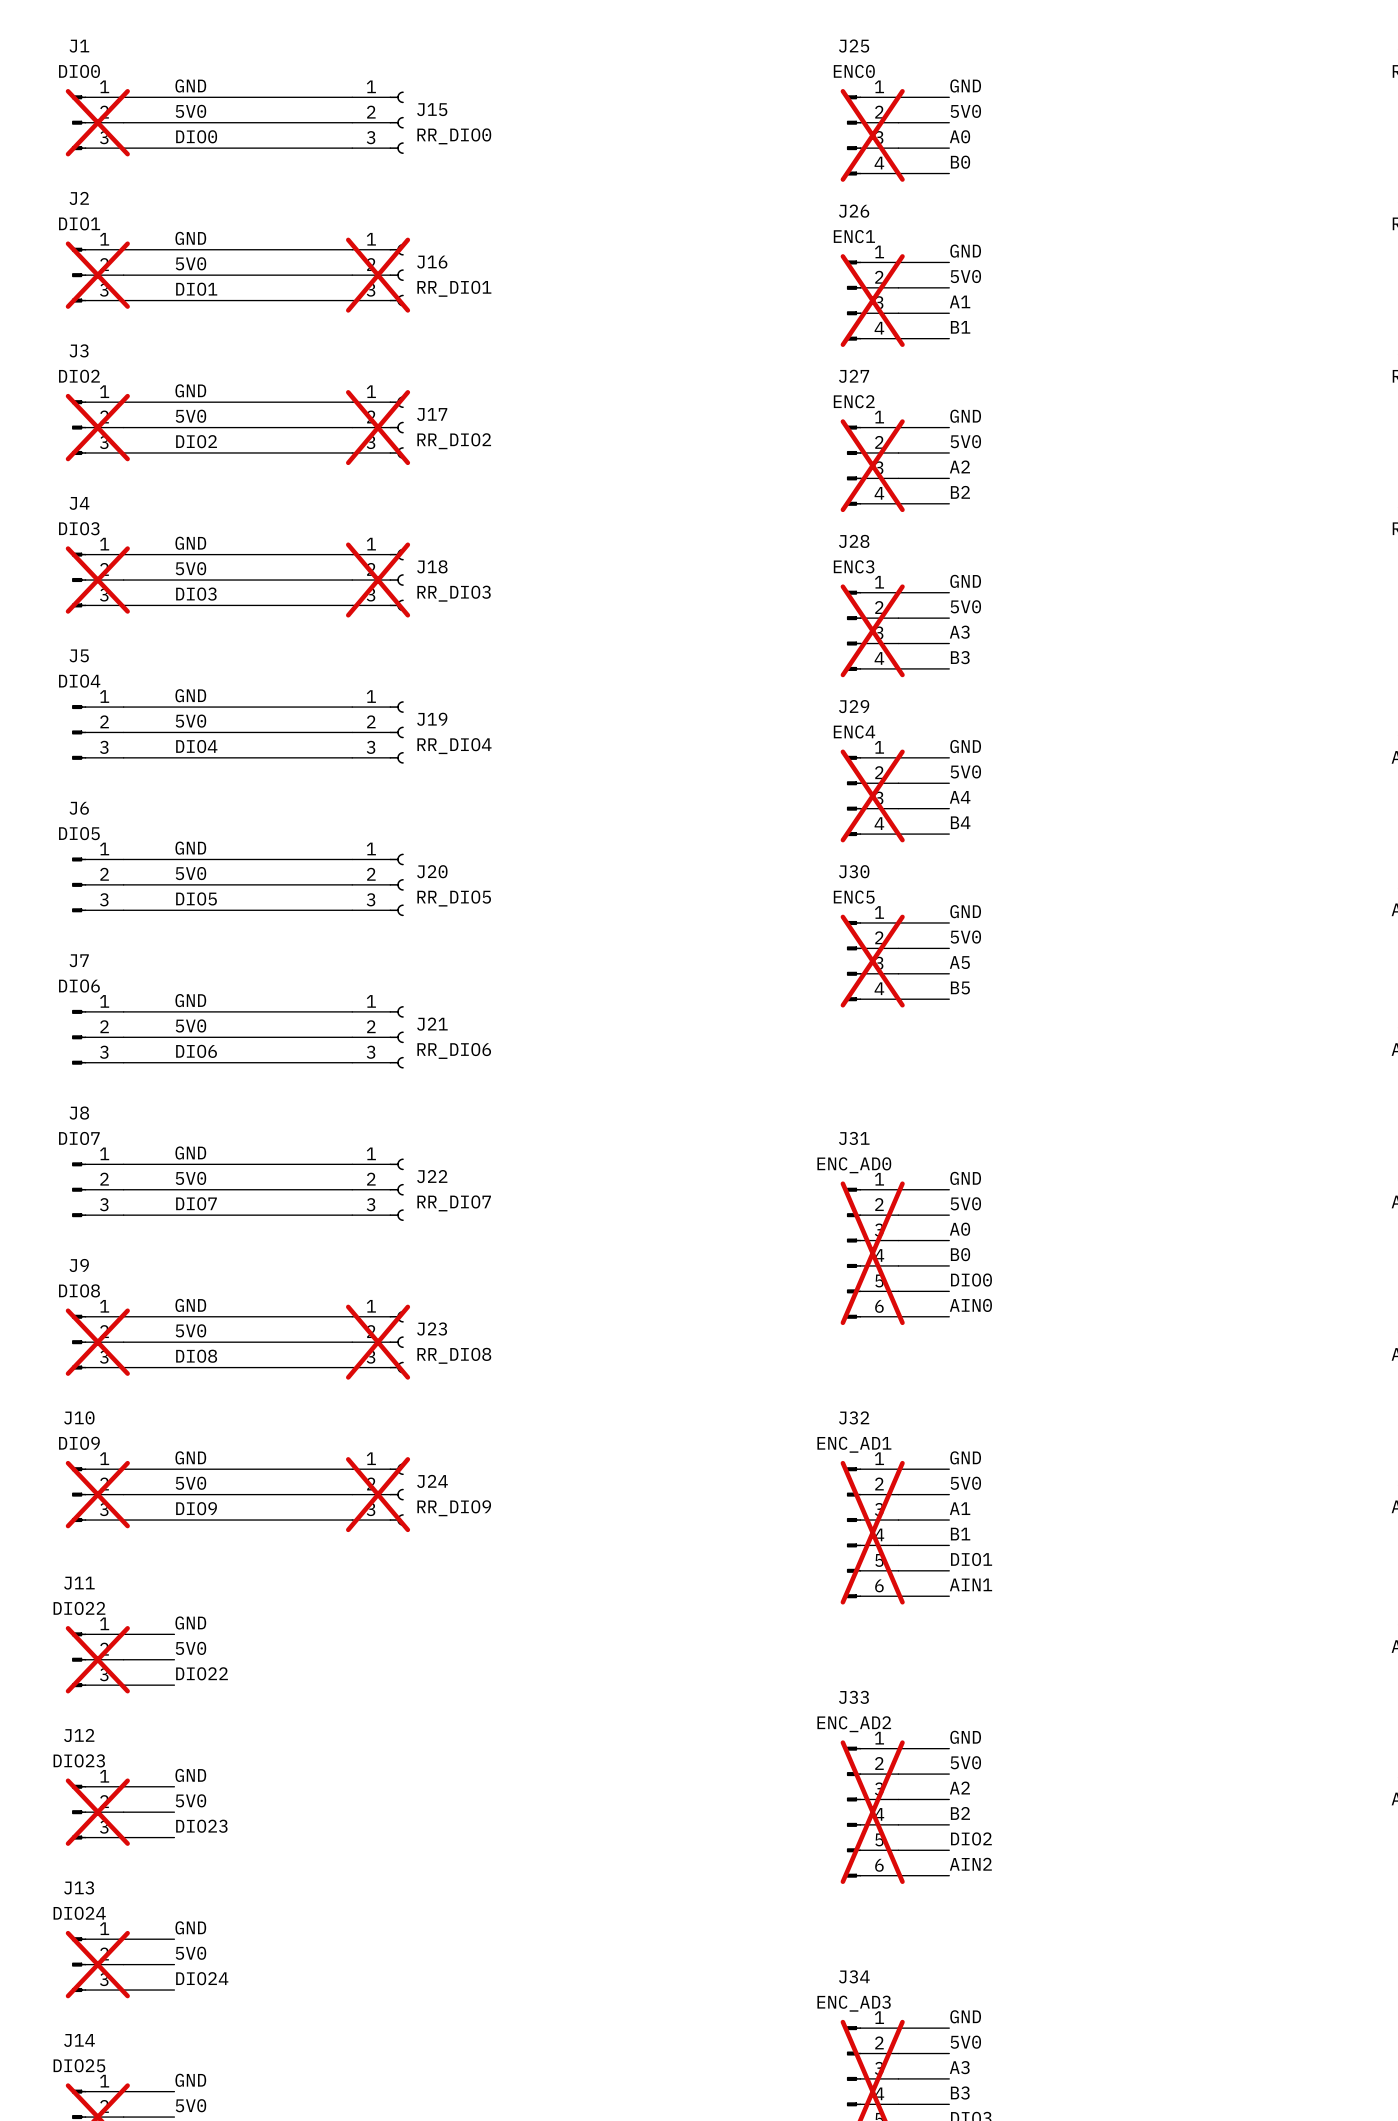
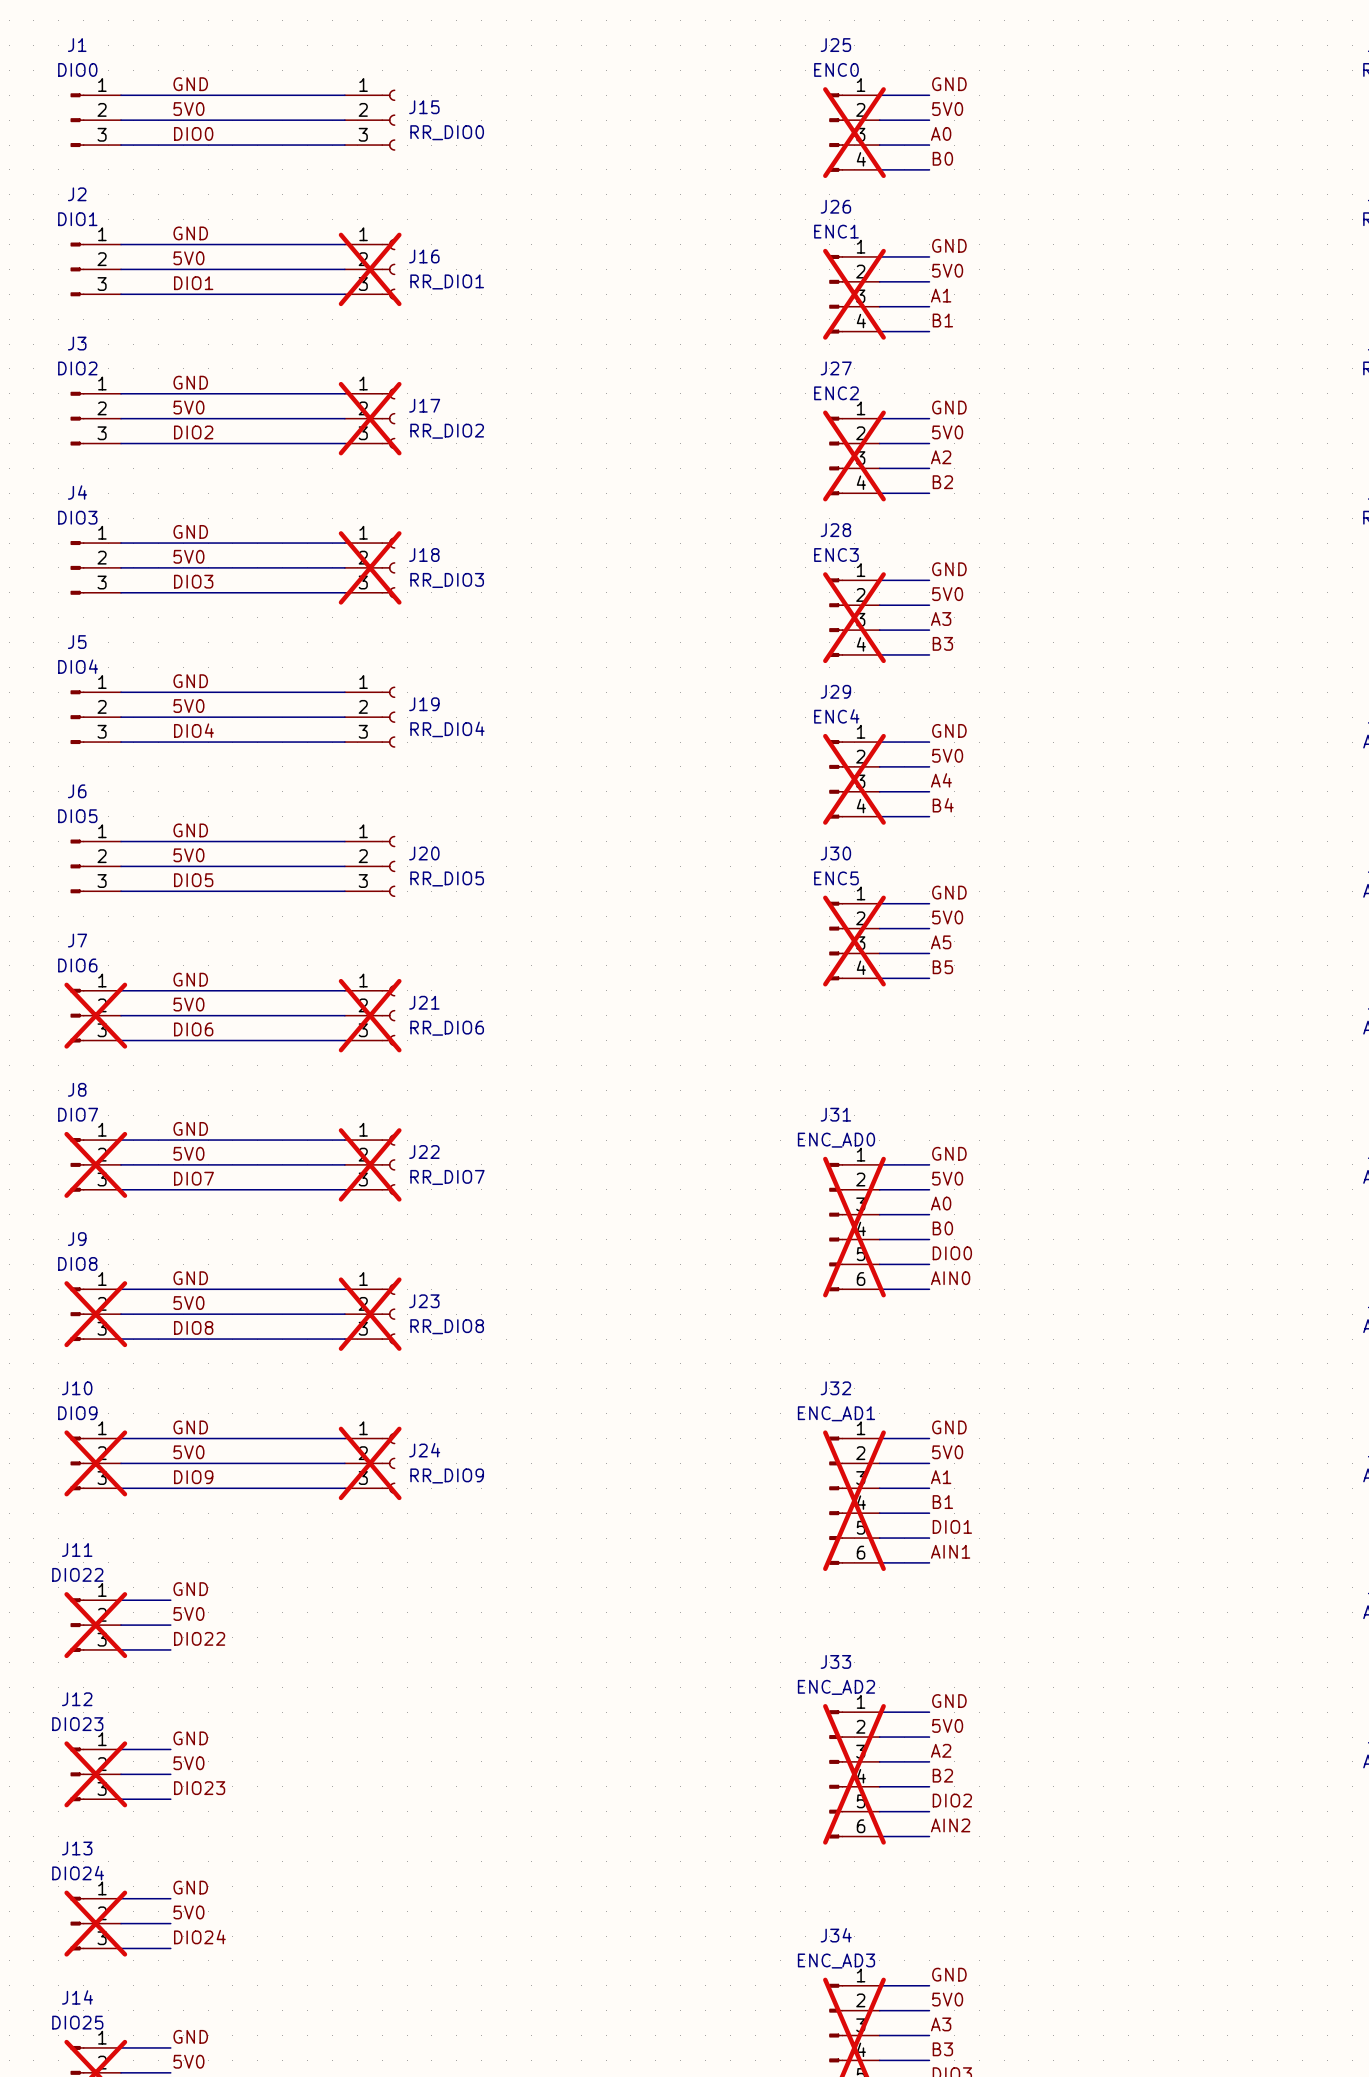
J1 do-not-place cross: (97, 122) -> none
J2 do-not-place cross: (97, 275) -> none
J3 do-not-place cross: (97, 427) -> none
J4 do-not-place cross: (97, 580) -> none
J7 do-not-place cross: none -> (95, 1015)
J21 do-not-place cross: none -> (370, 1015)
J8 do-not-place cross: none -> (95, 1164)
J22 do-not-place cross: none -> (370, 1164)

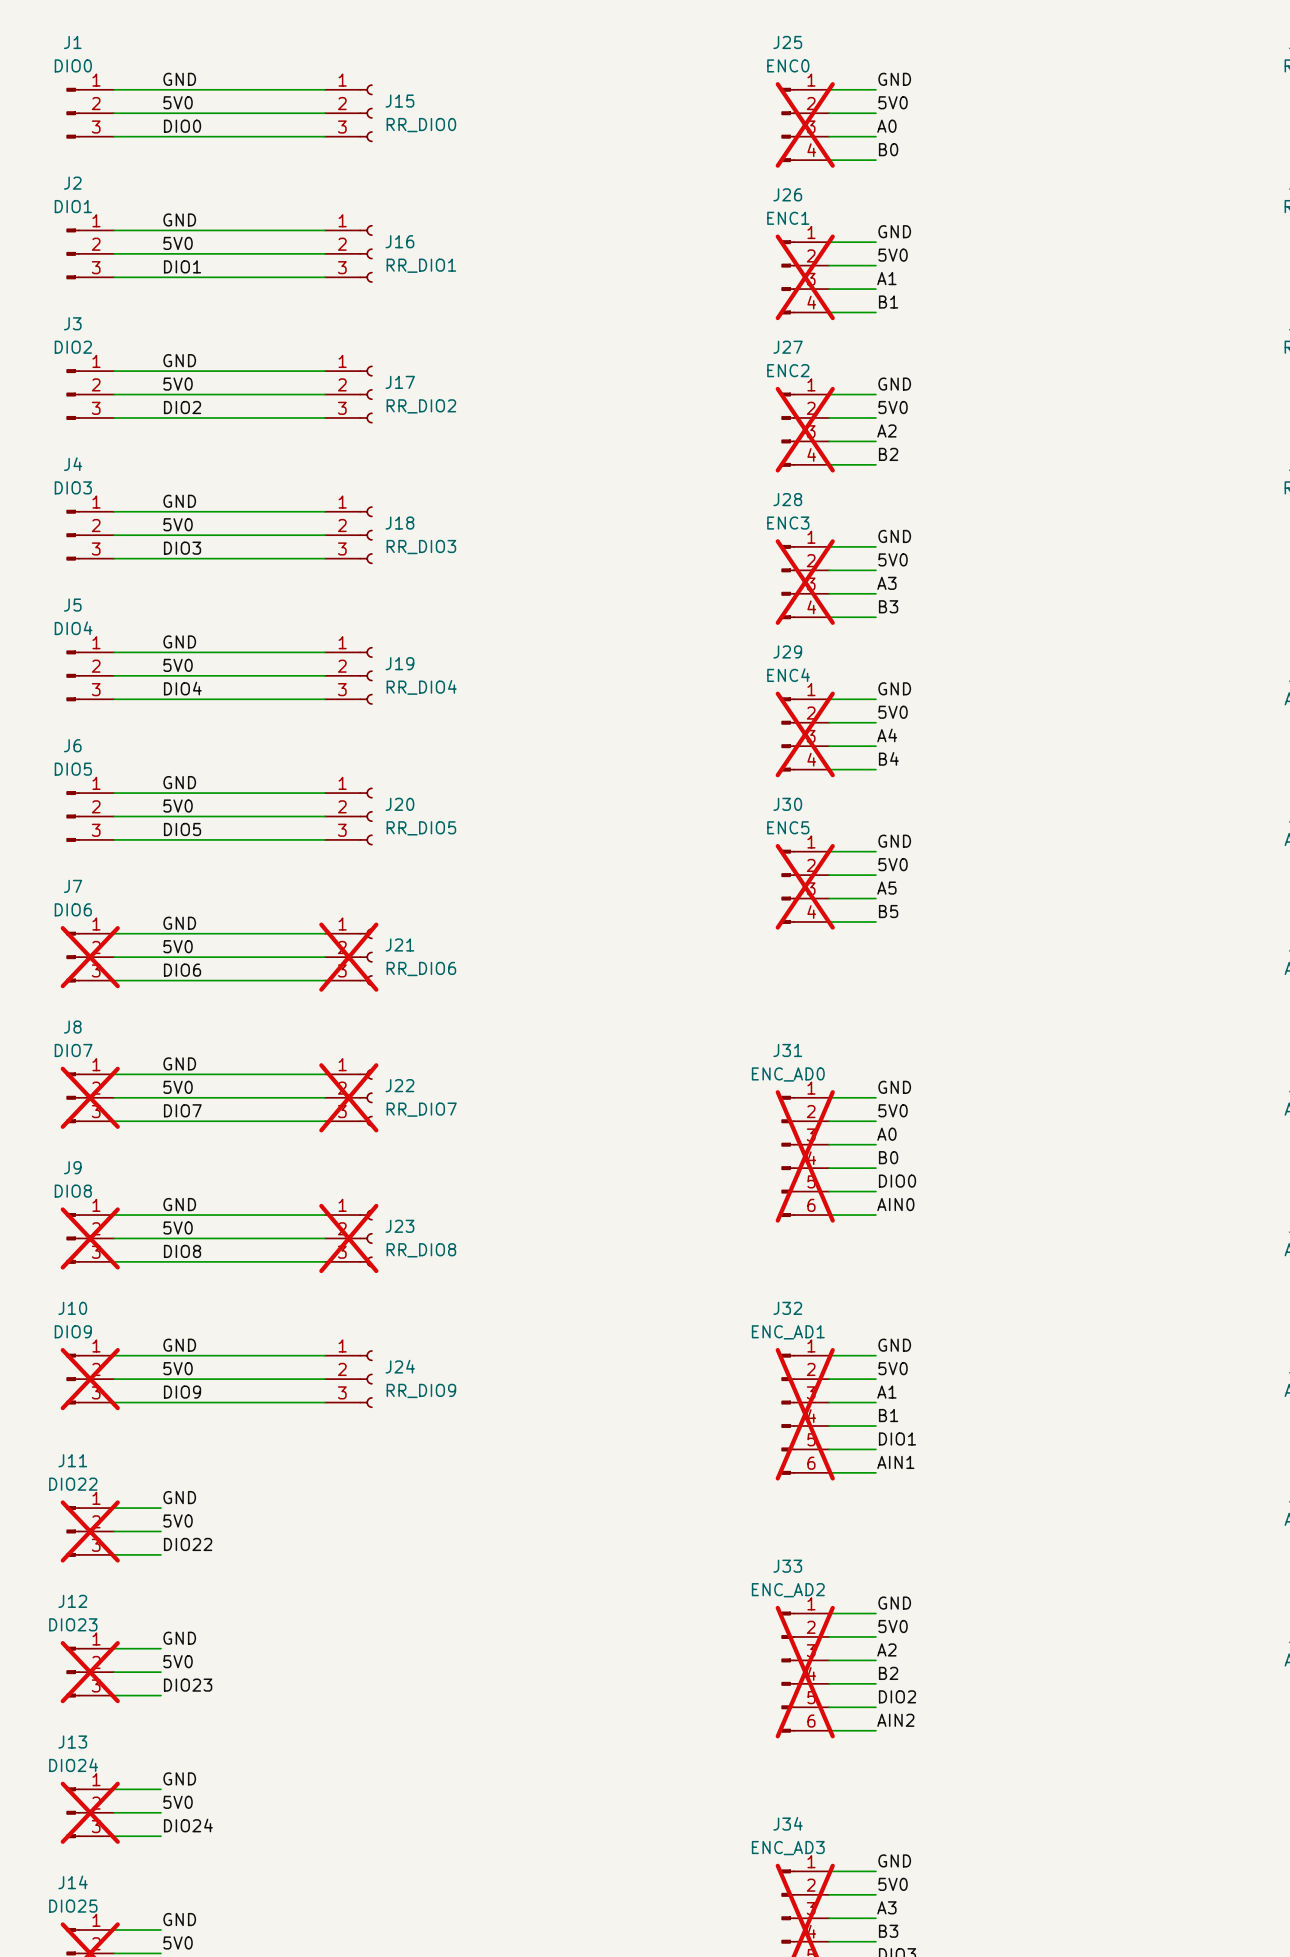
J16 do-not-place cross: (370, 269) -> none
J17 do-not-place cross: (370, 418) -> none
J18 do-not-place cross: (370, 567) -> none
J24 do-not-place cross: (370, 1463) -> none

